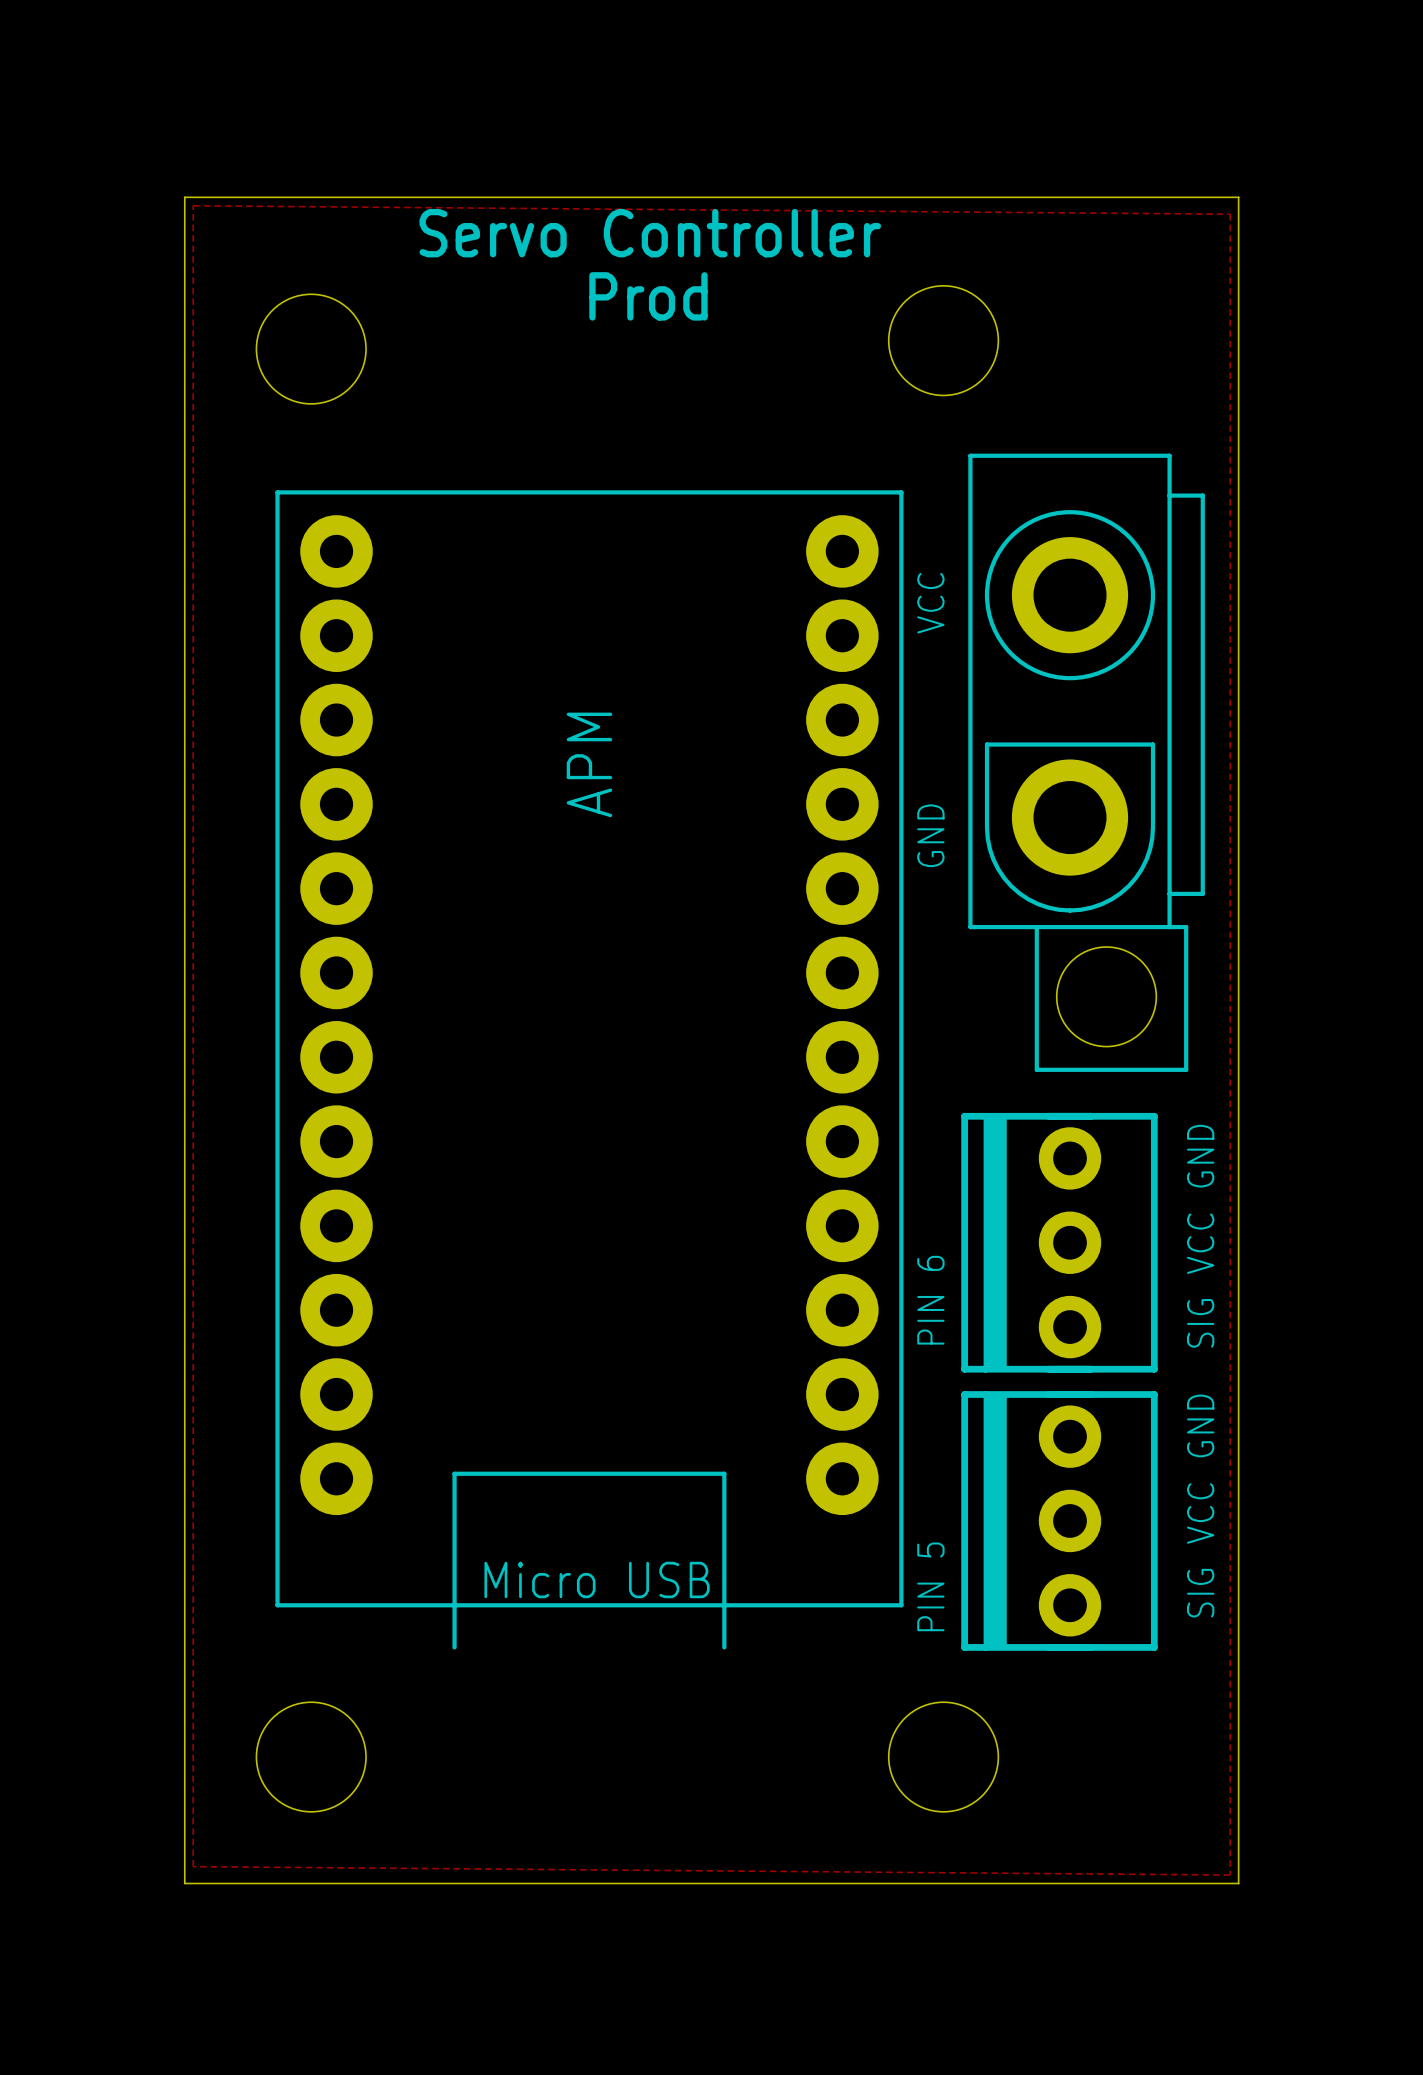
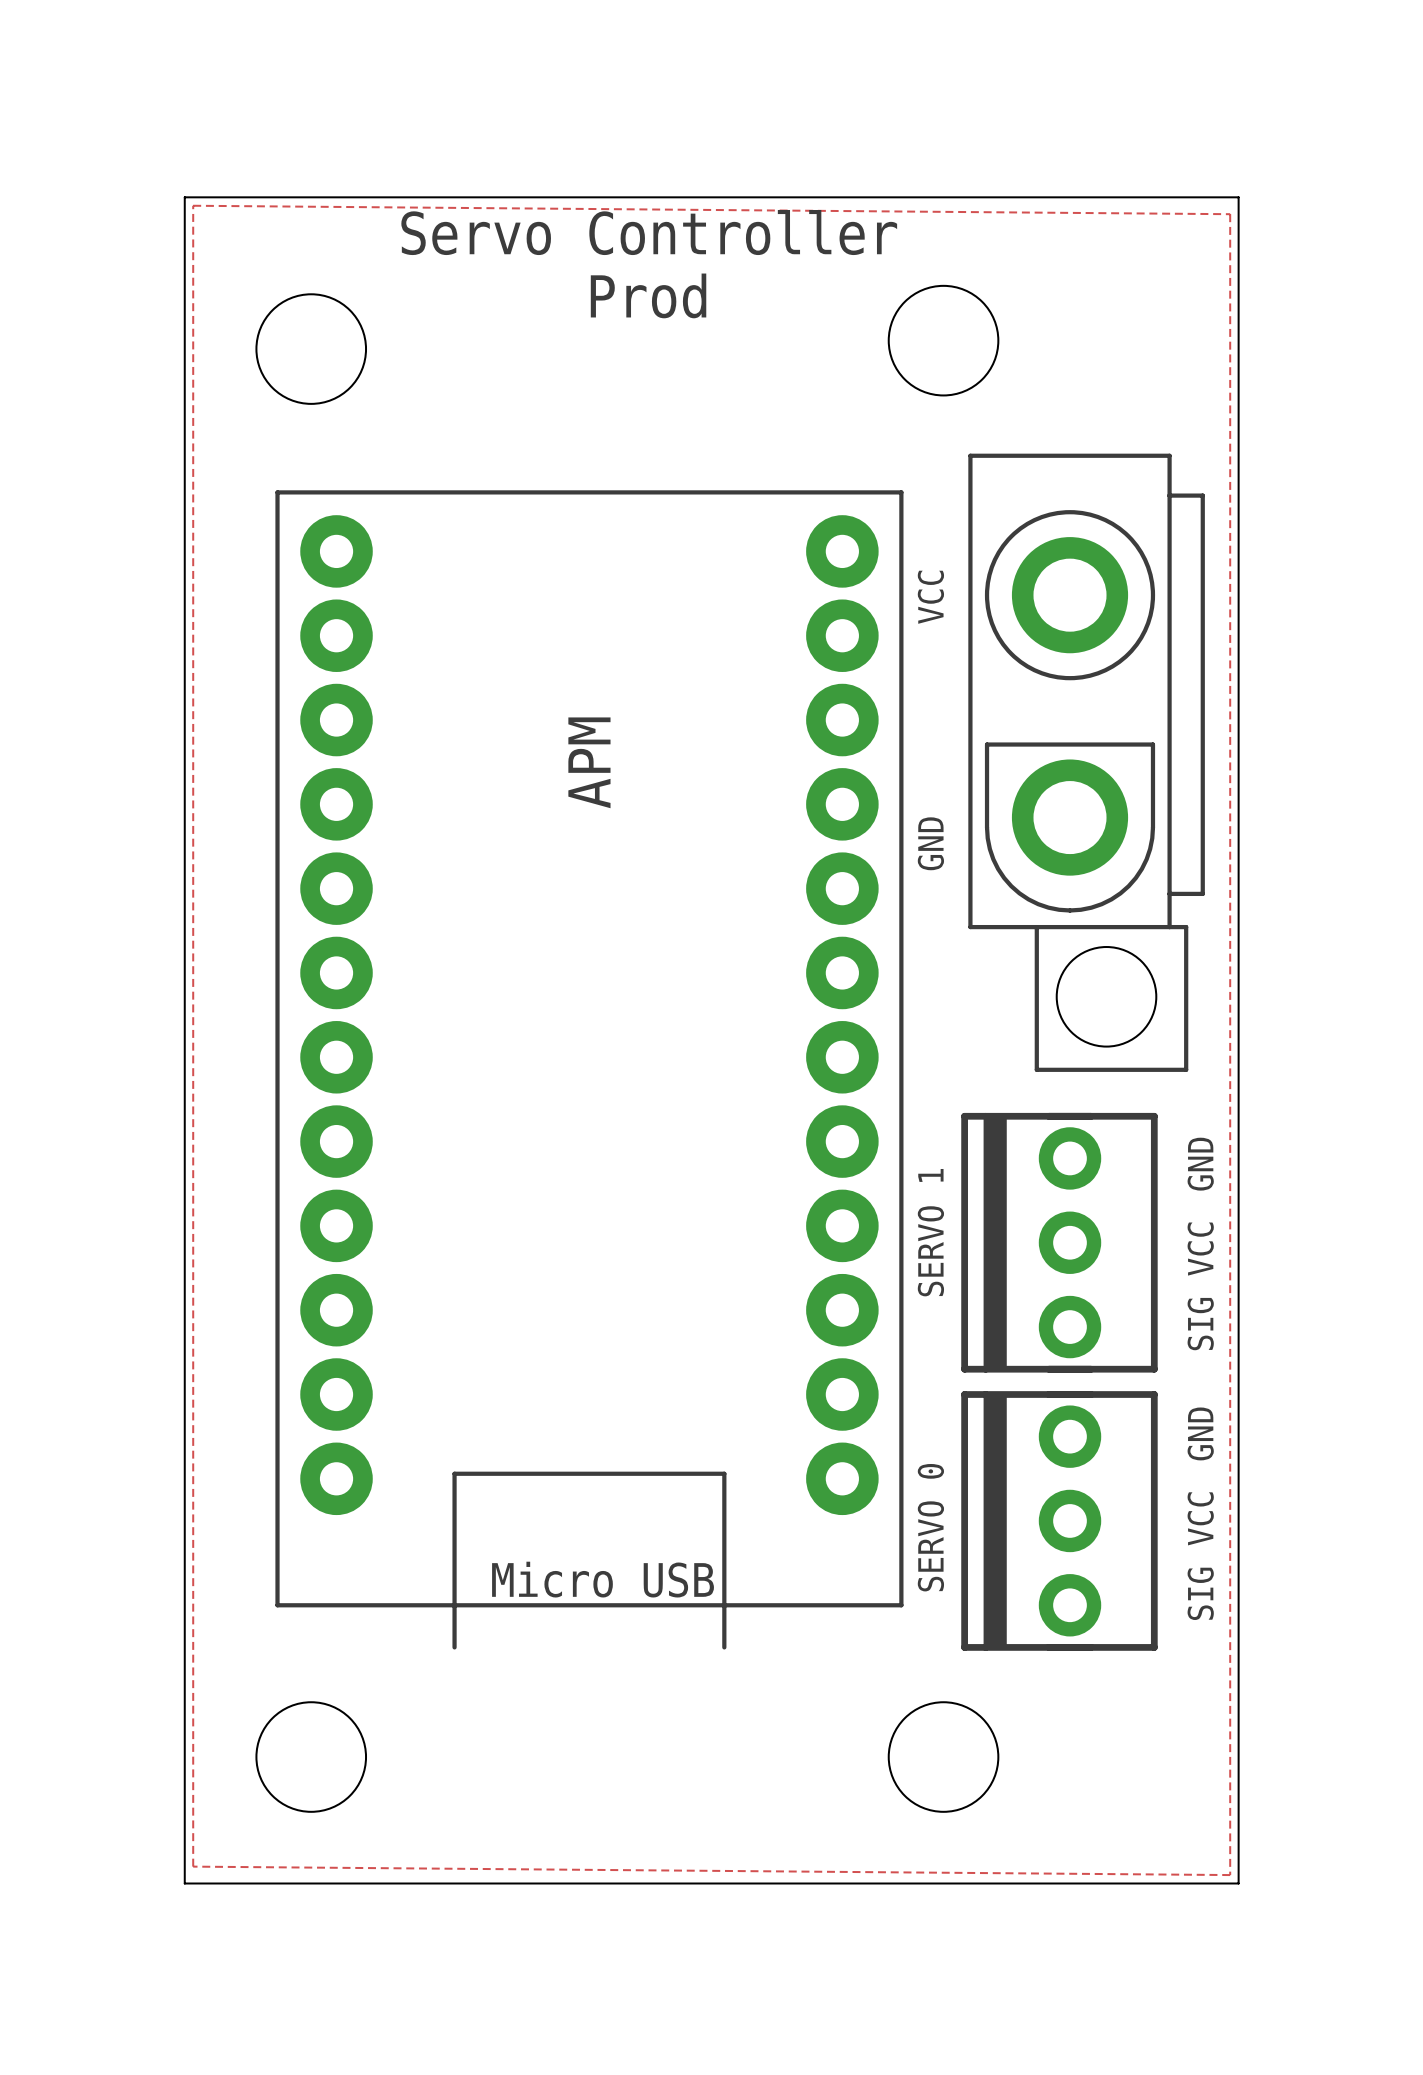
text: none -> SERVO 1 (930, 1232)
text: PIN 6 (930, 1300) -> none
text: none -> SERVO 0 (930, 1527)
text: PIN 5 (930, 1586) -> none

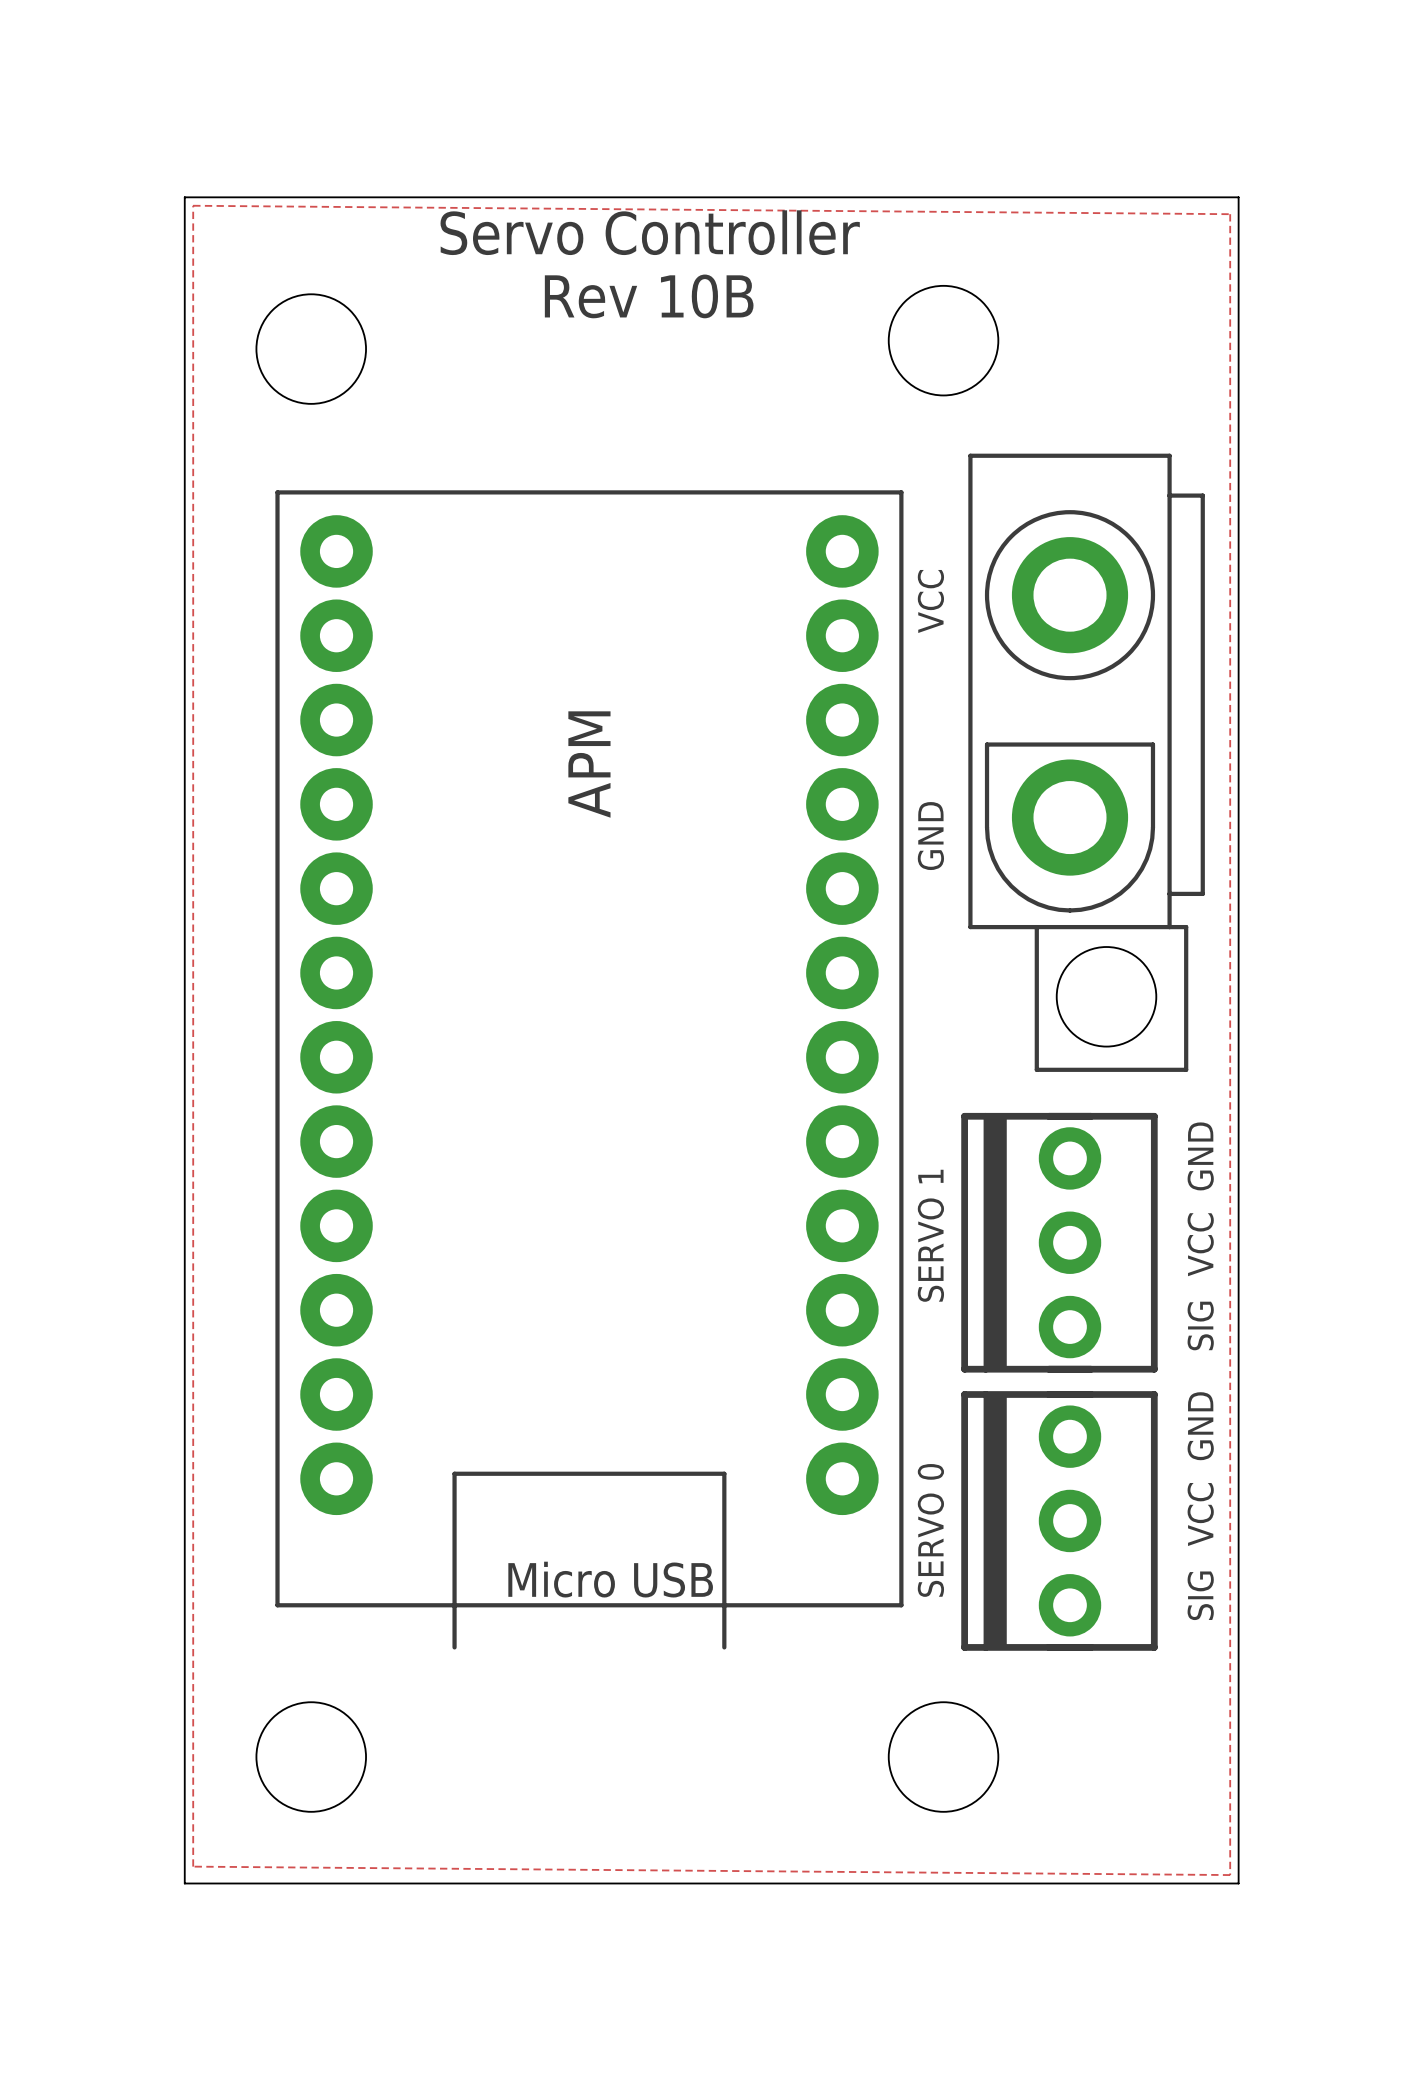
text: Prod (648, 295) -> Rev 10B (649, 296)

